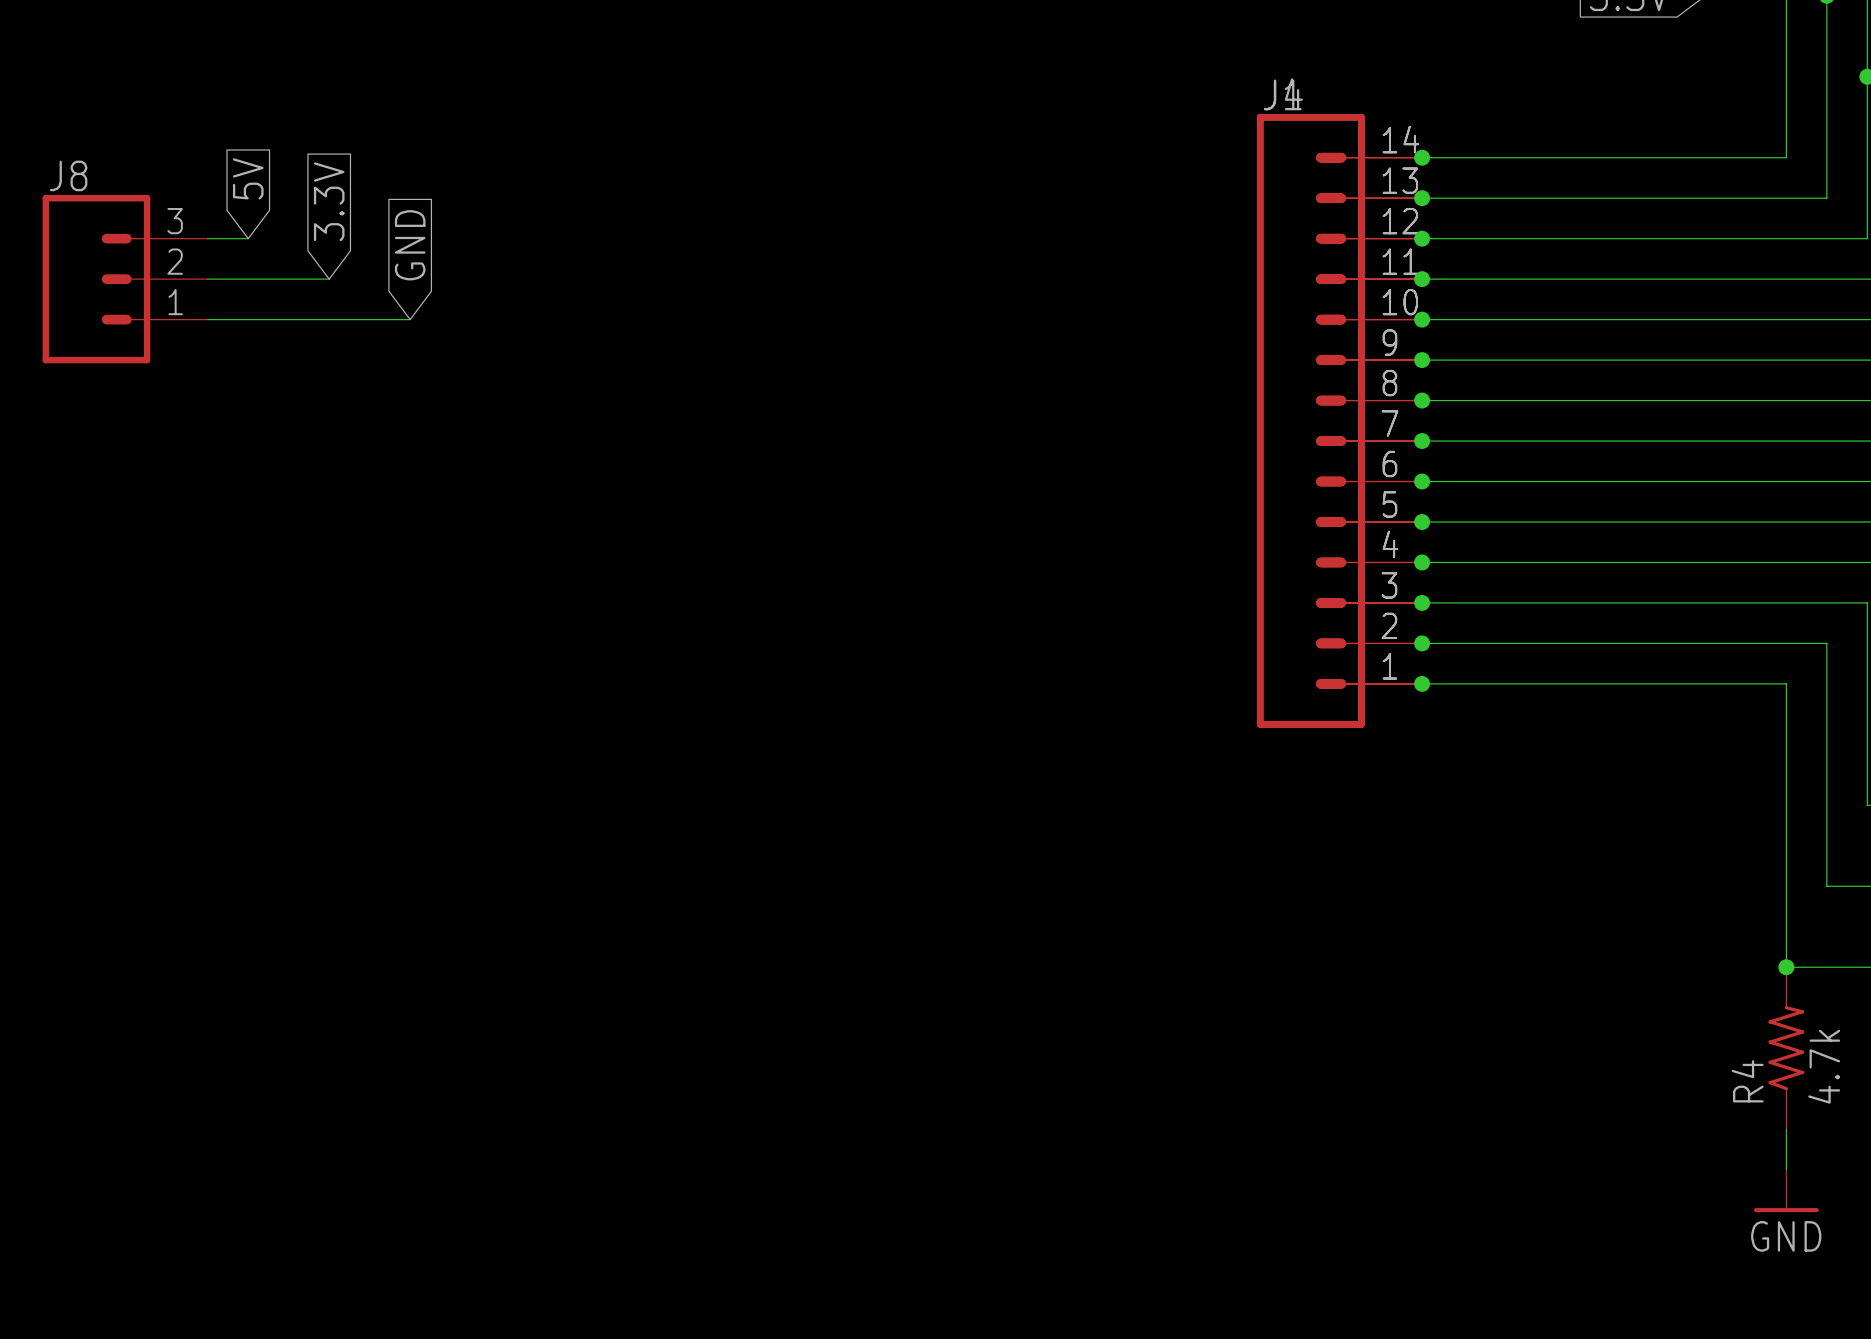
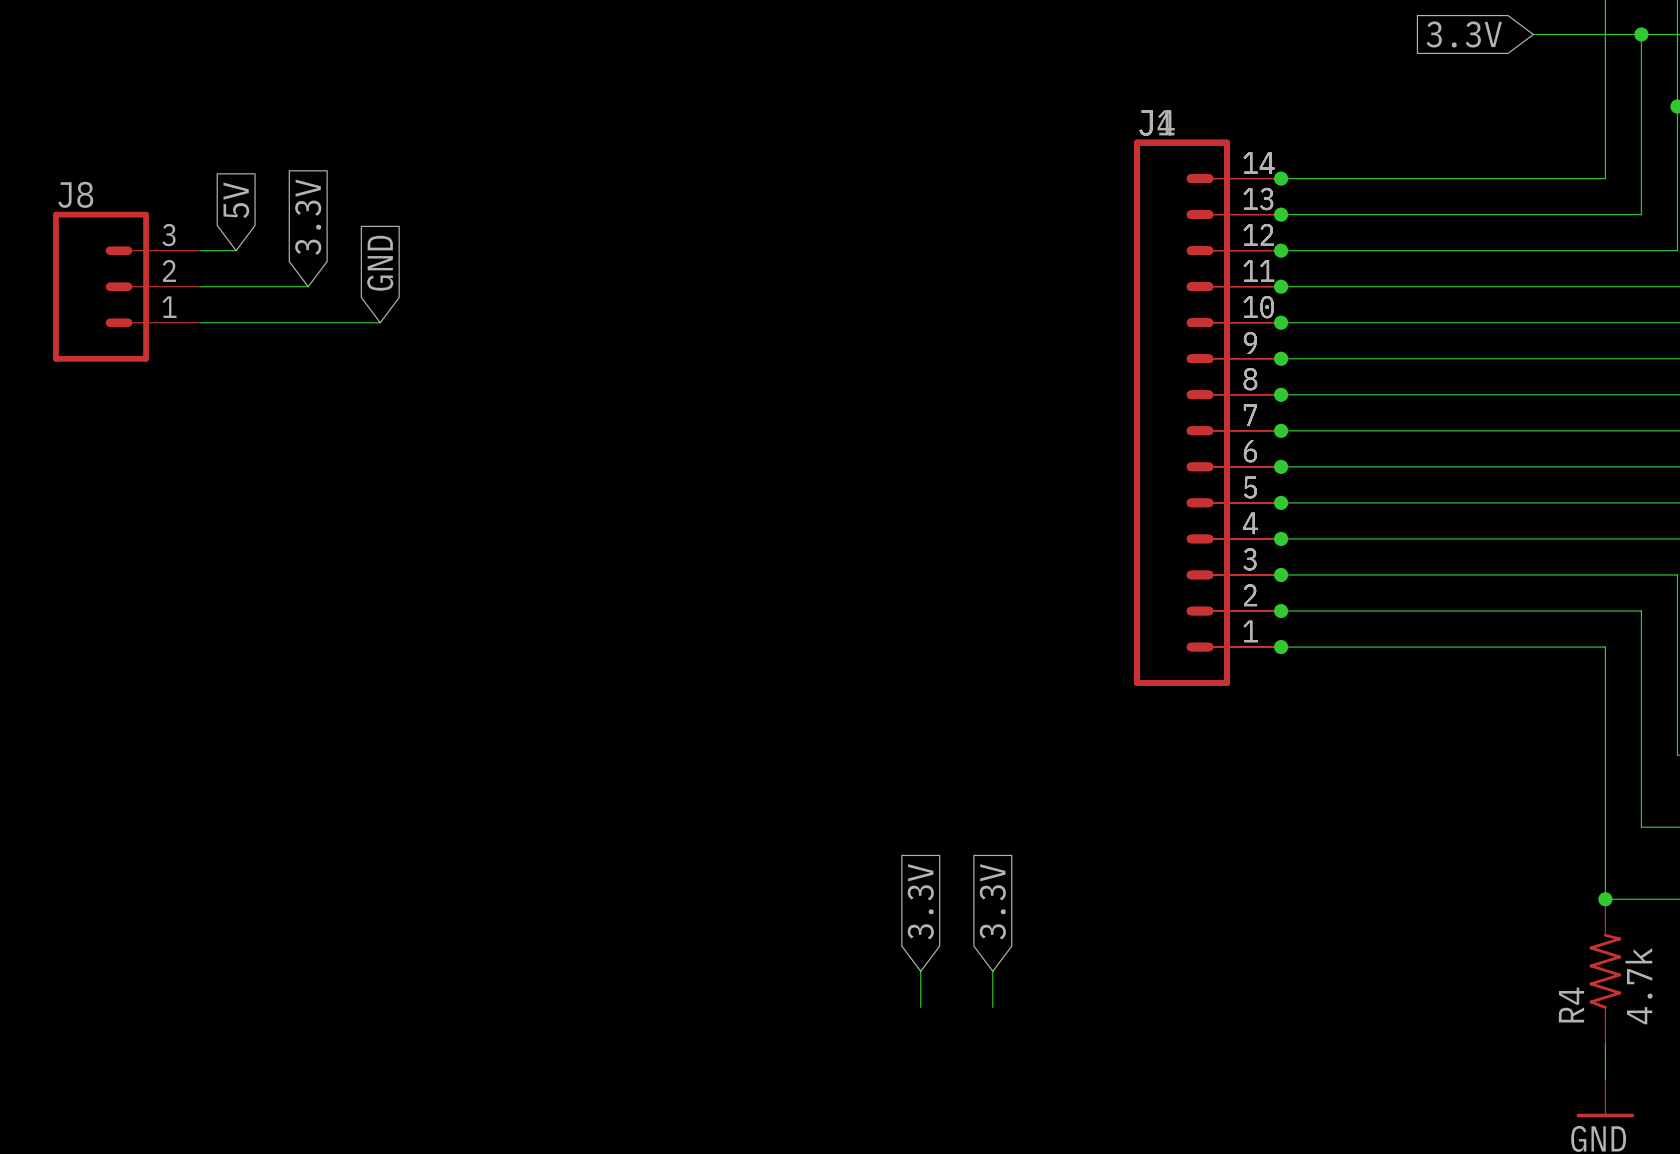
global label: none -> 3.3V (920, 901)
global label: none -> 3.3V (992, 901)
wire: none -> (920, 971) (920, 1007)
wire: none -> (992, 971) (992, 1007)

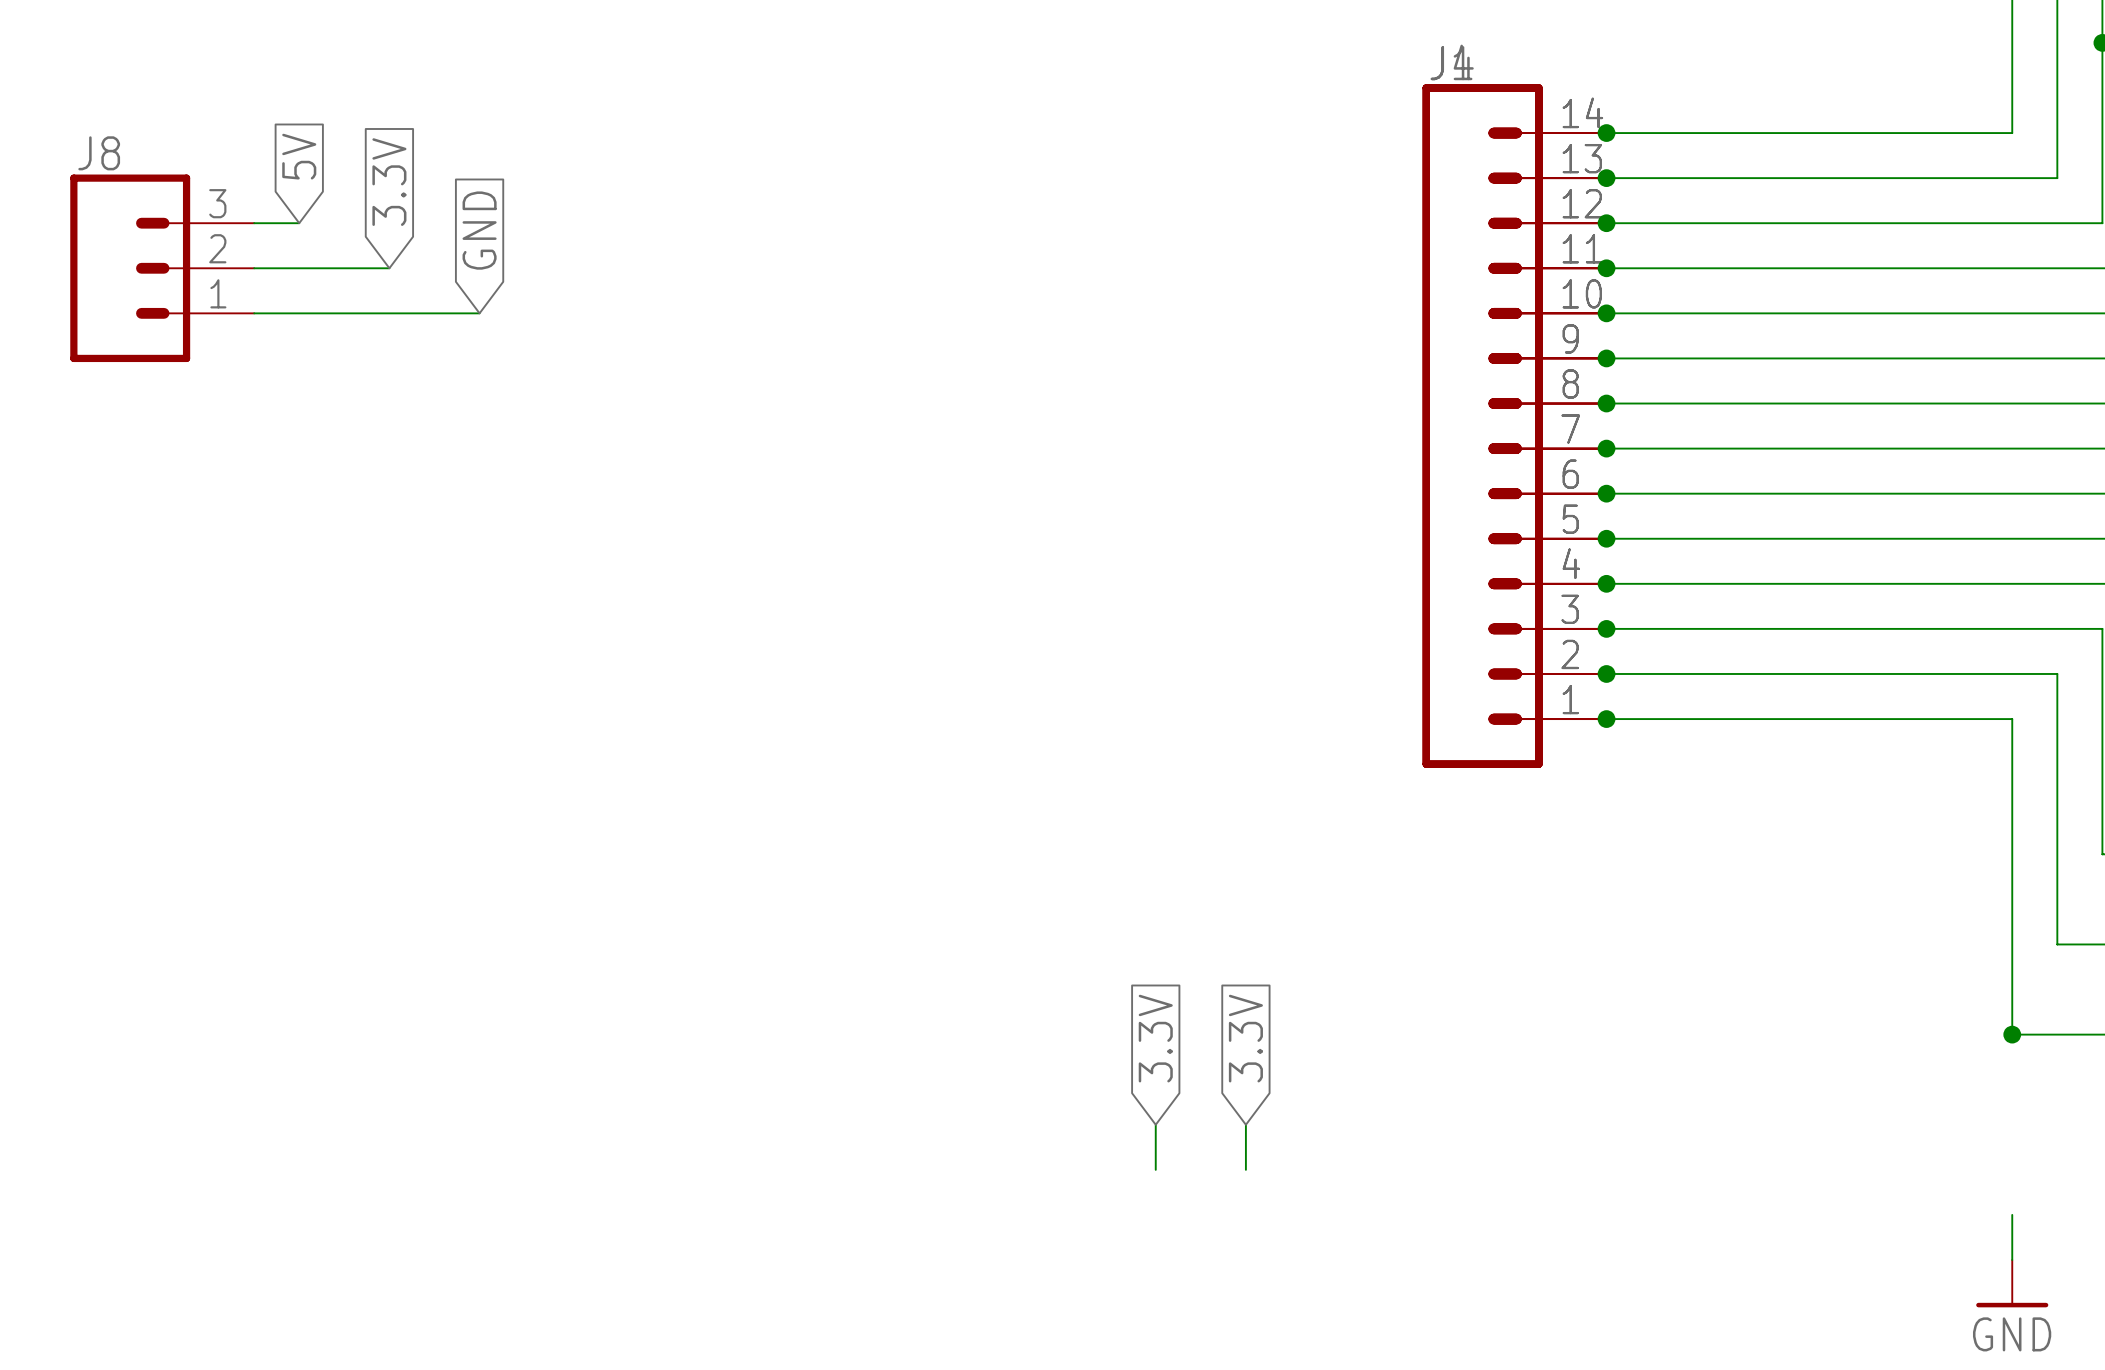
R4: 4.7k (1605, 971) -> none

